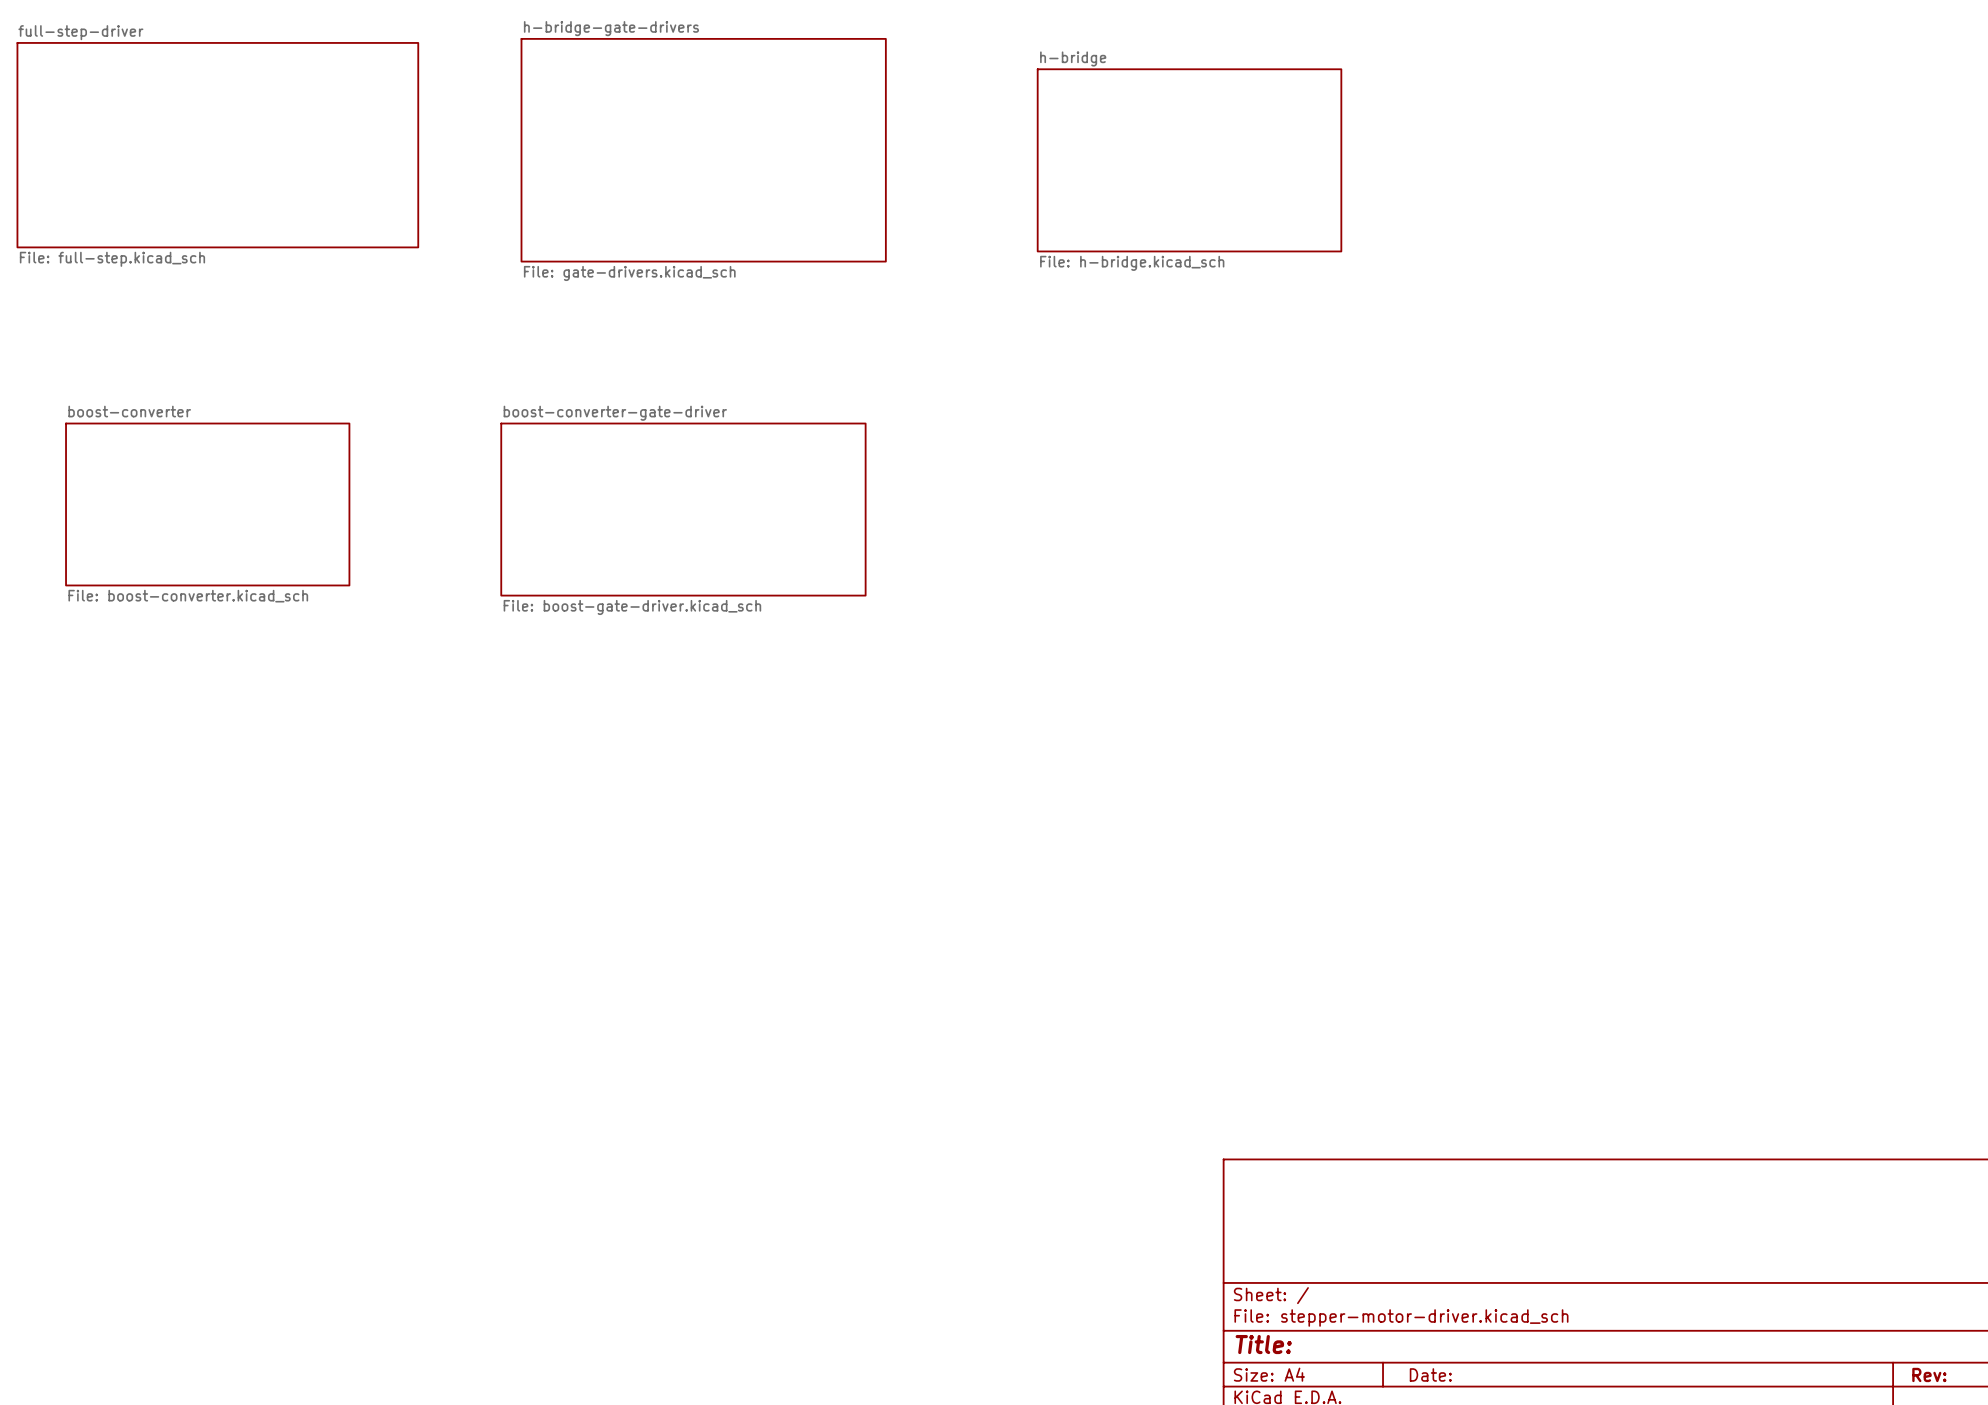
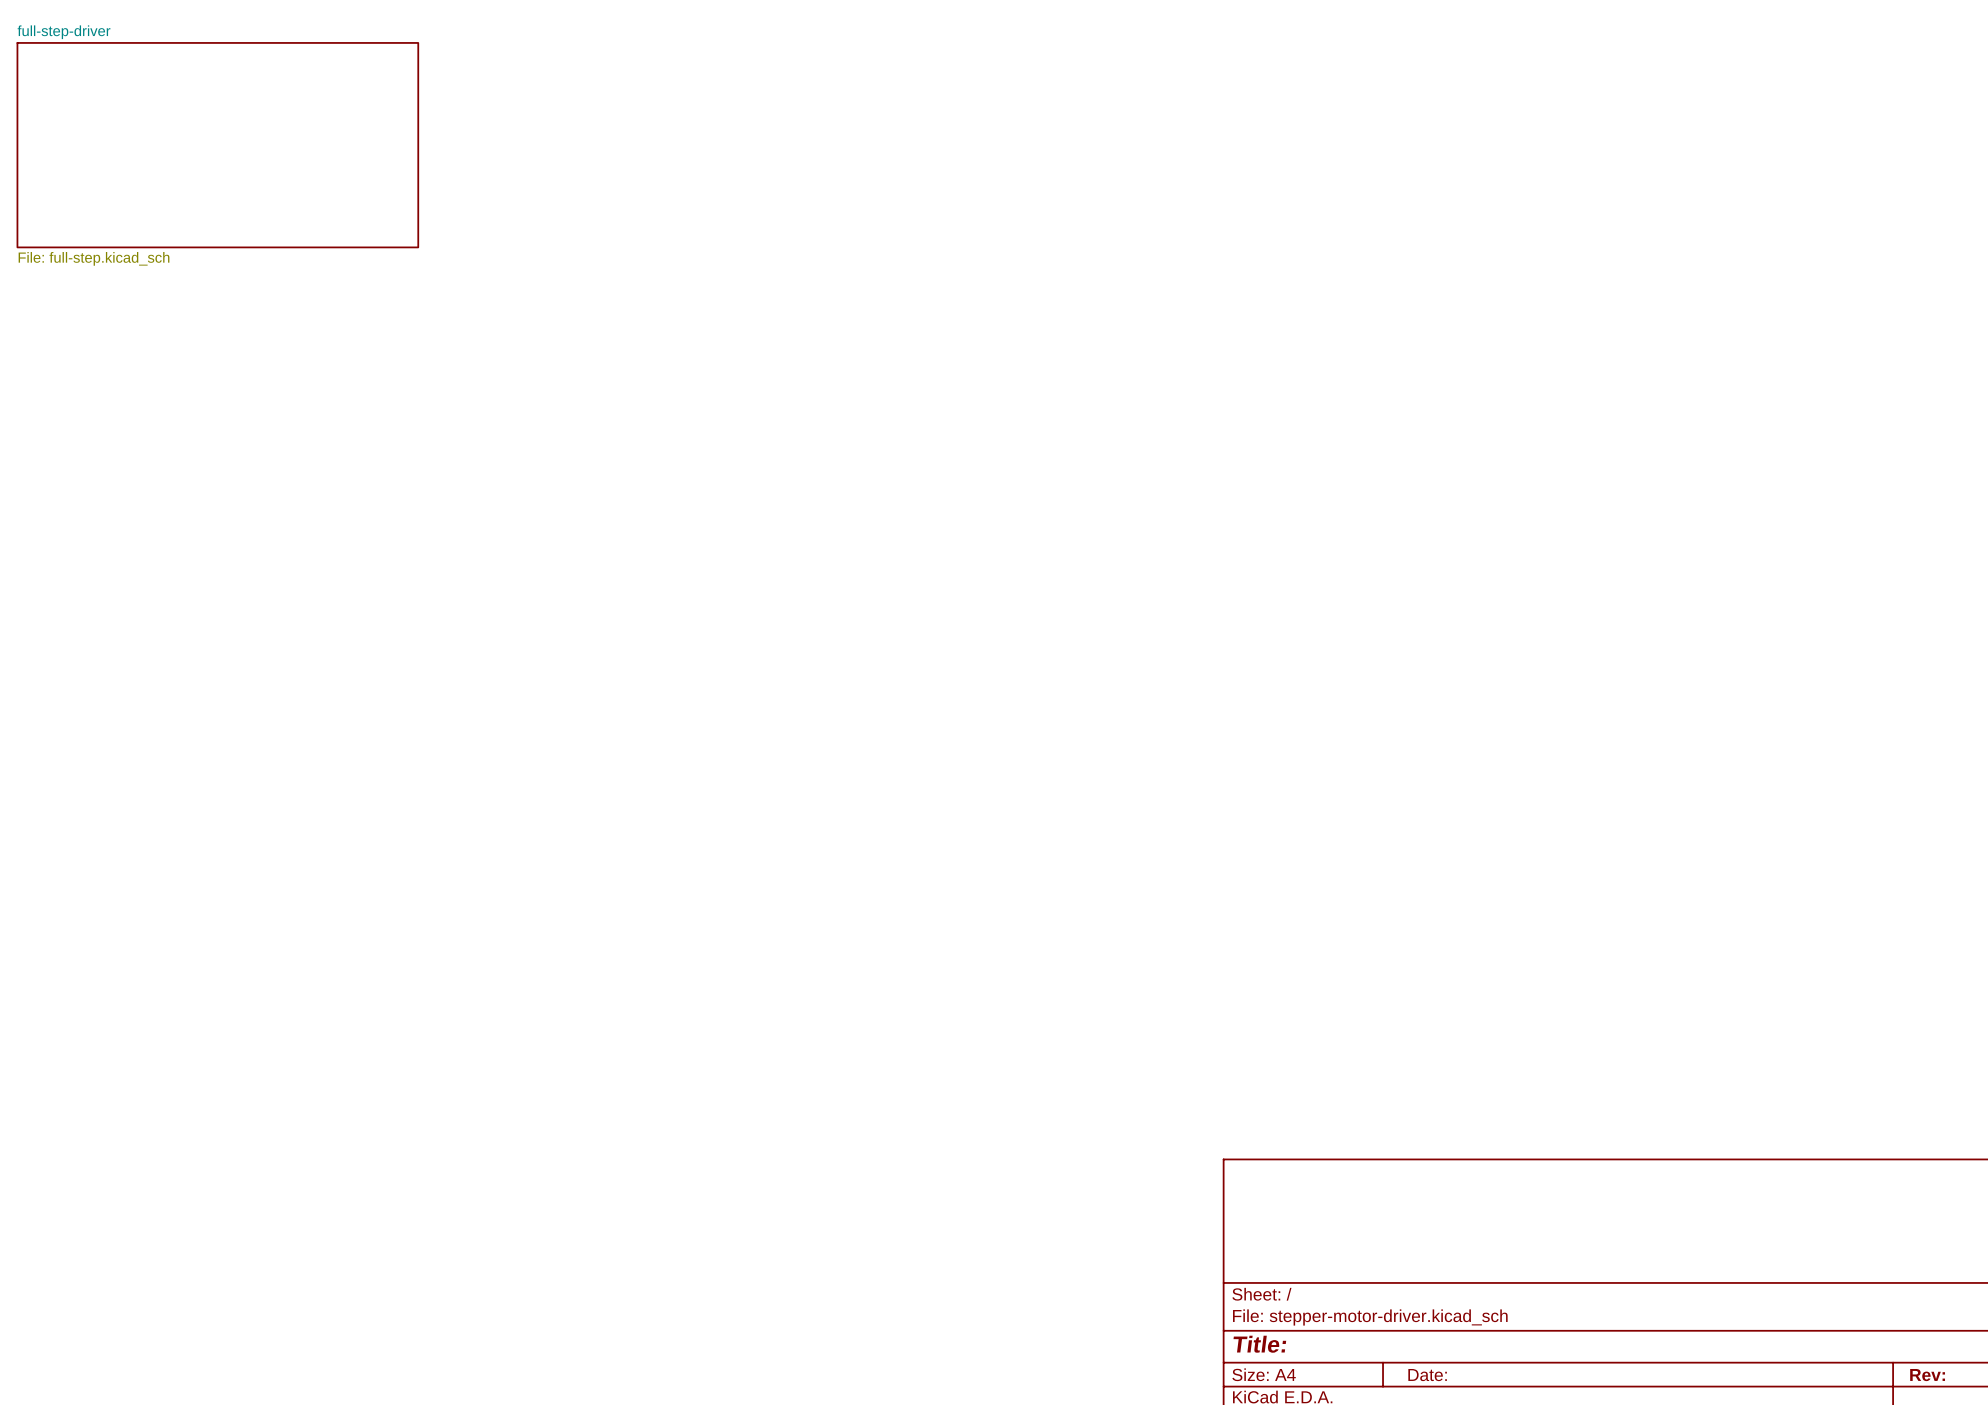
sheet h-bridge-gate-drivers: File: gate-drivers.kicad_sch (703, 150) -> none
sheet h-bridge: File: h-bridge.kicad_sch (1189, 160) -> none
sheet boost-converter: File: boost-converter.kicad_sch (207, 504) -> none
sheet boost-converter-gate-driver: File: boost-gate-driver.kicad_sch (683, 509) -> none

